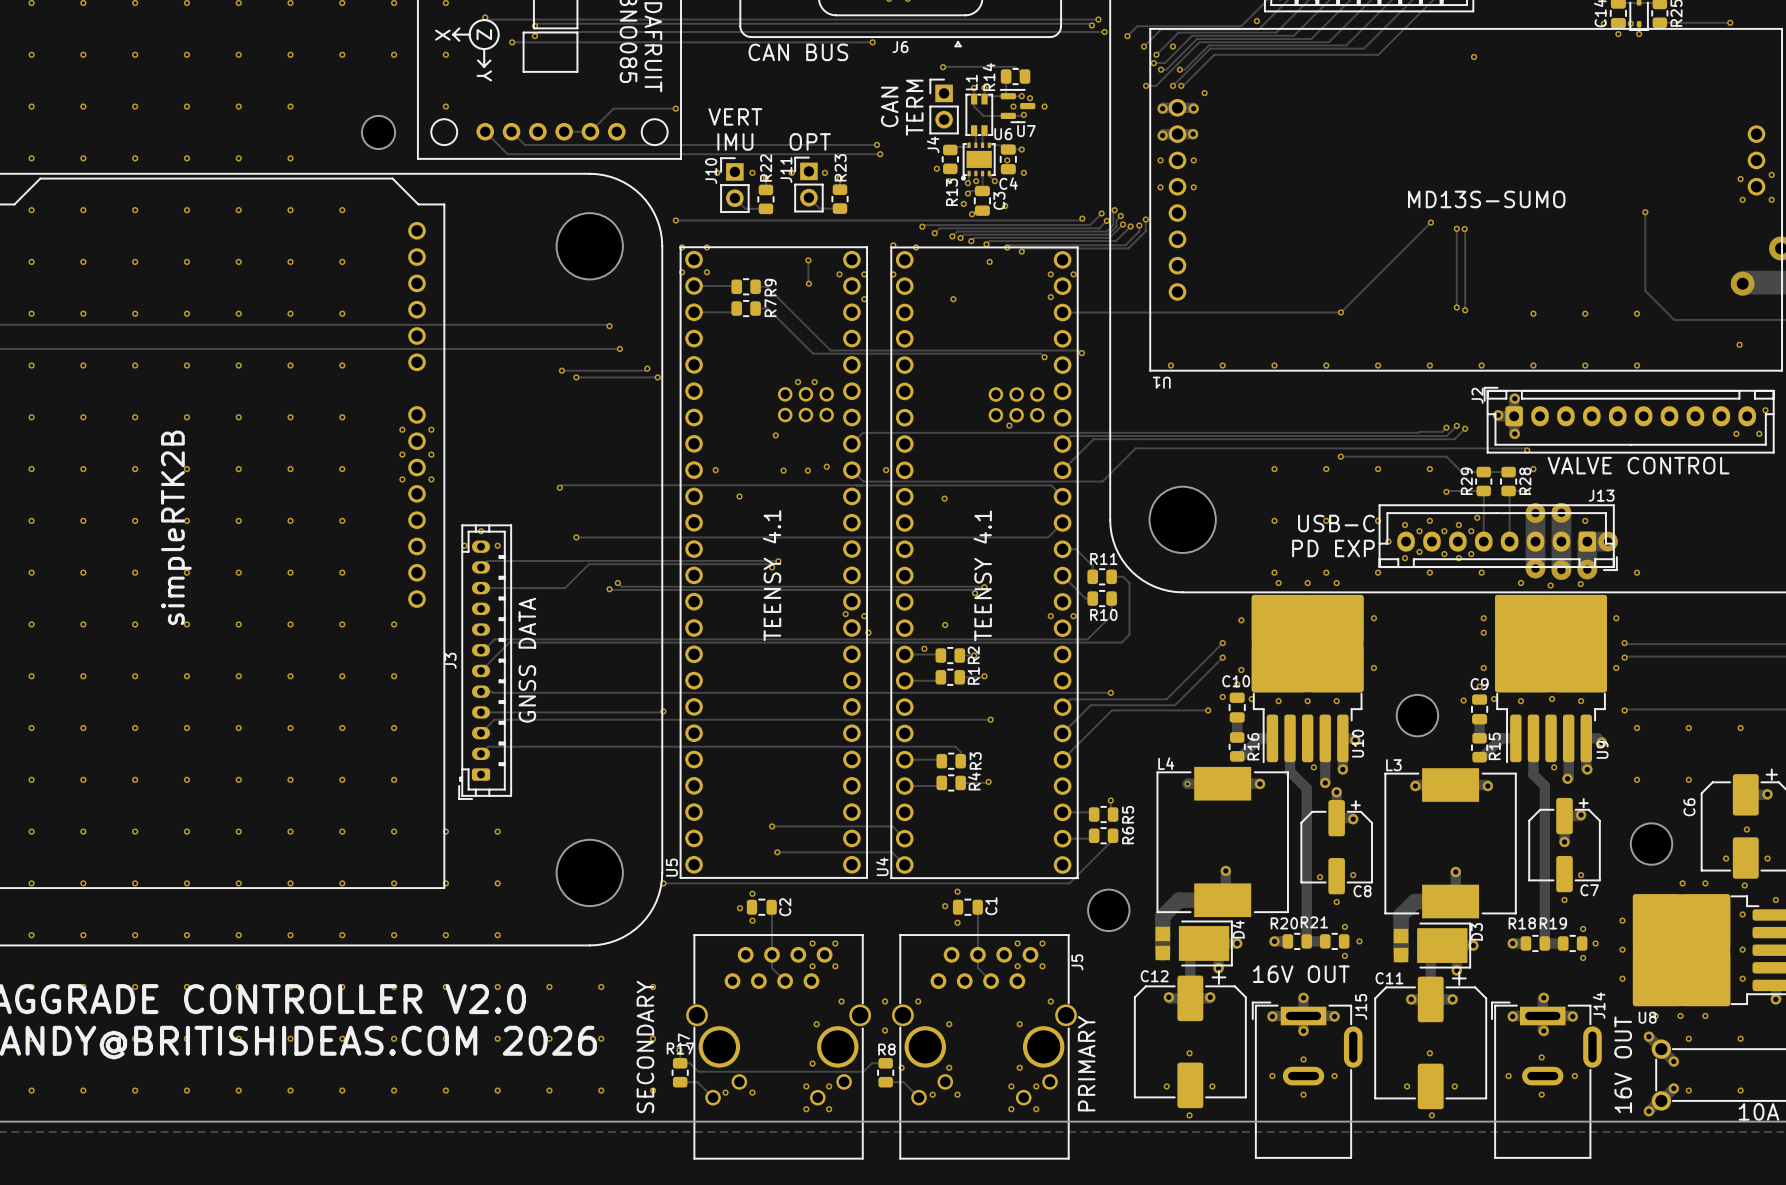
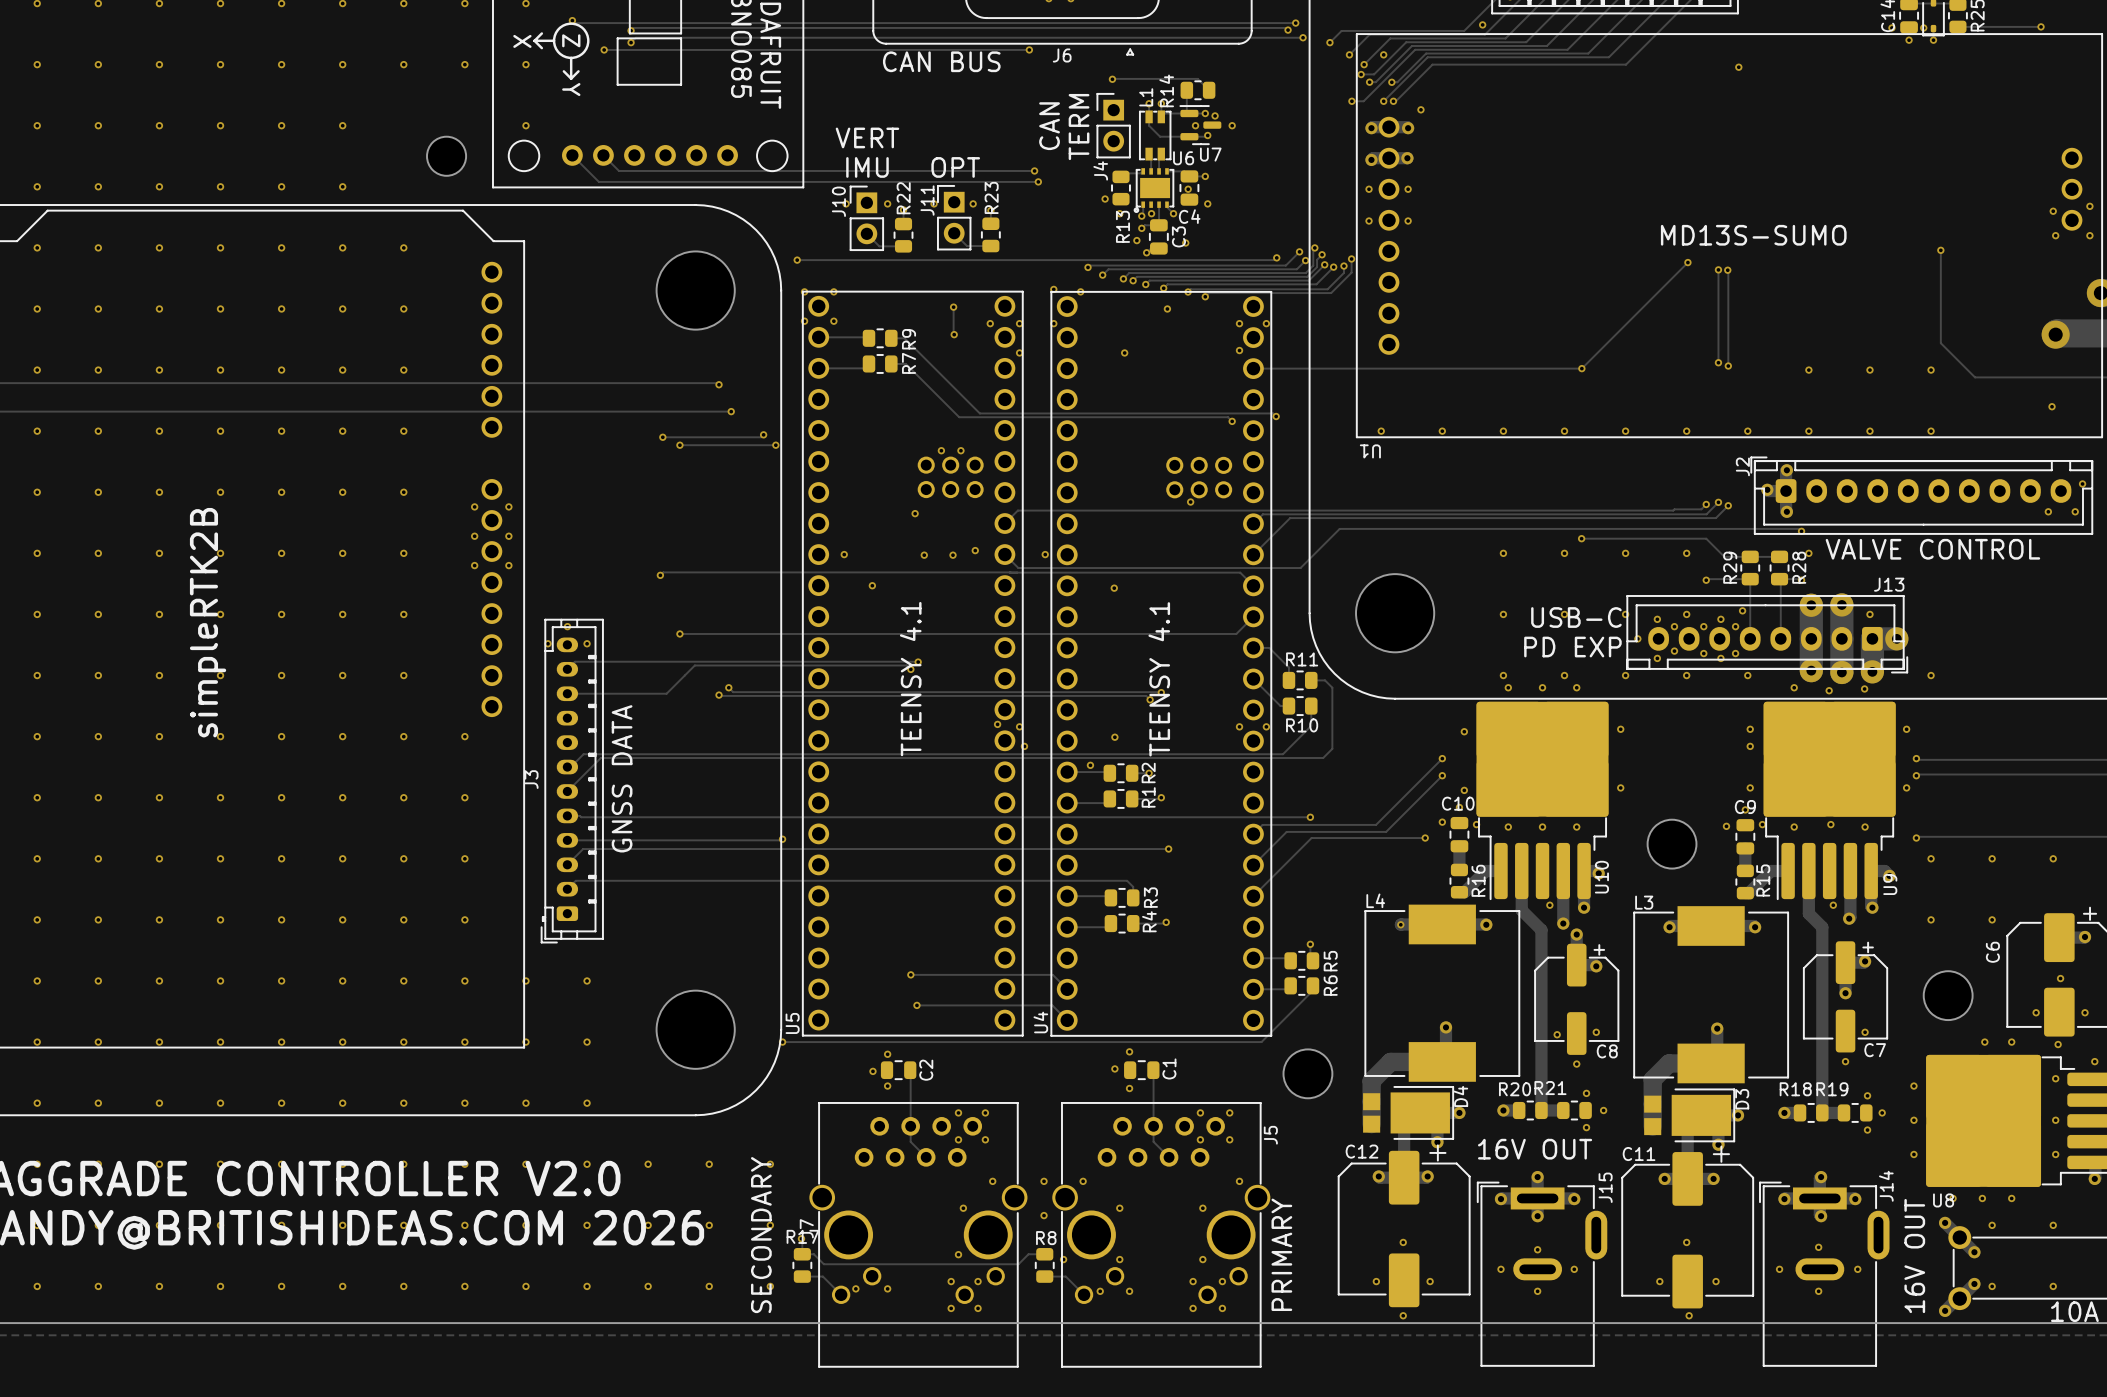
track: (675, 108) (613, 108) (590, 131) (564, 131) -> none
via: (675, 108) -> none

